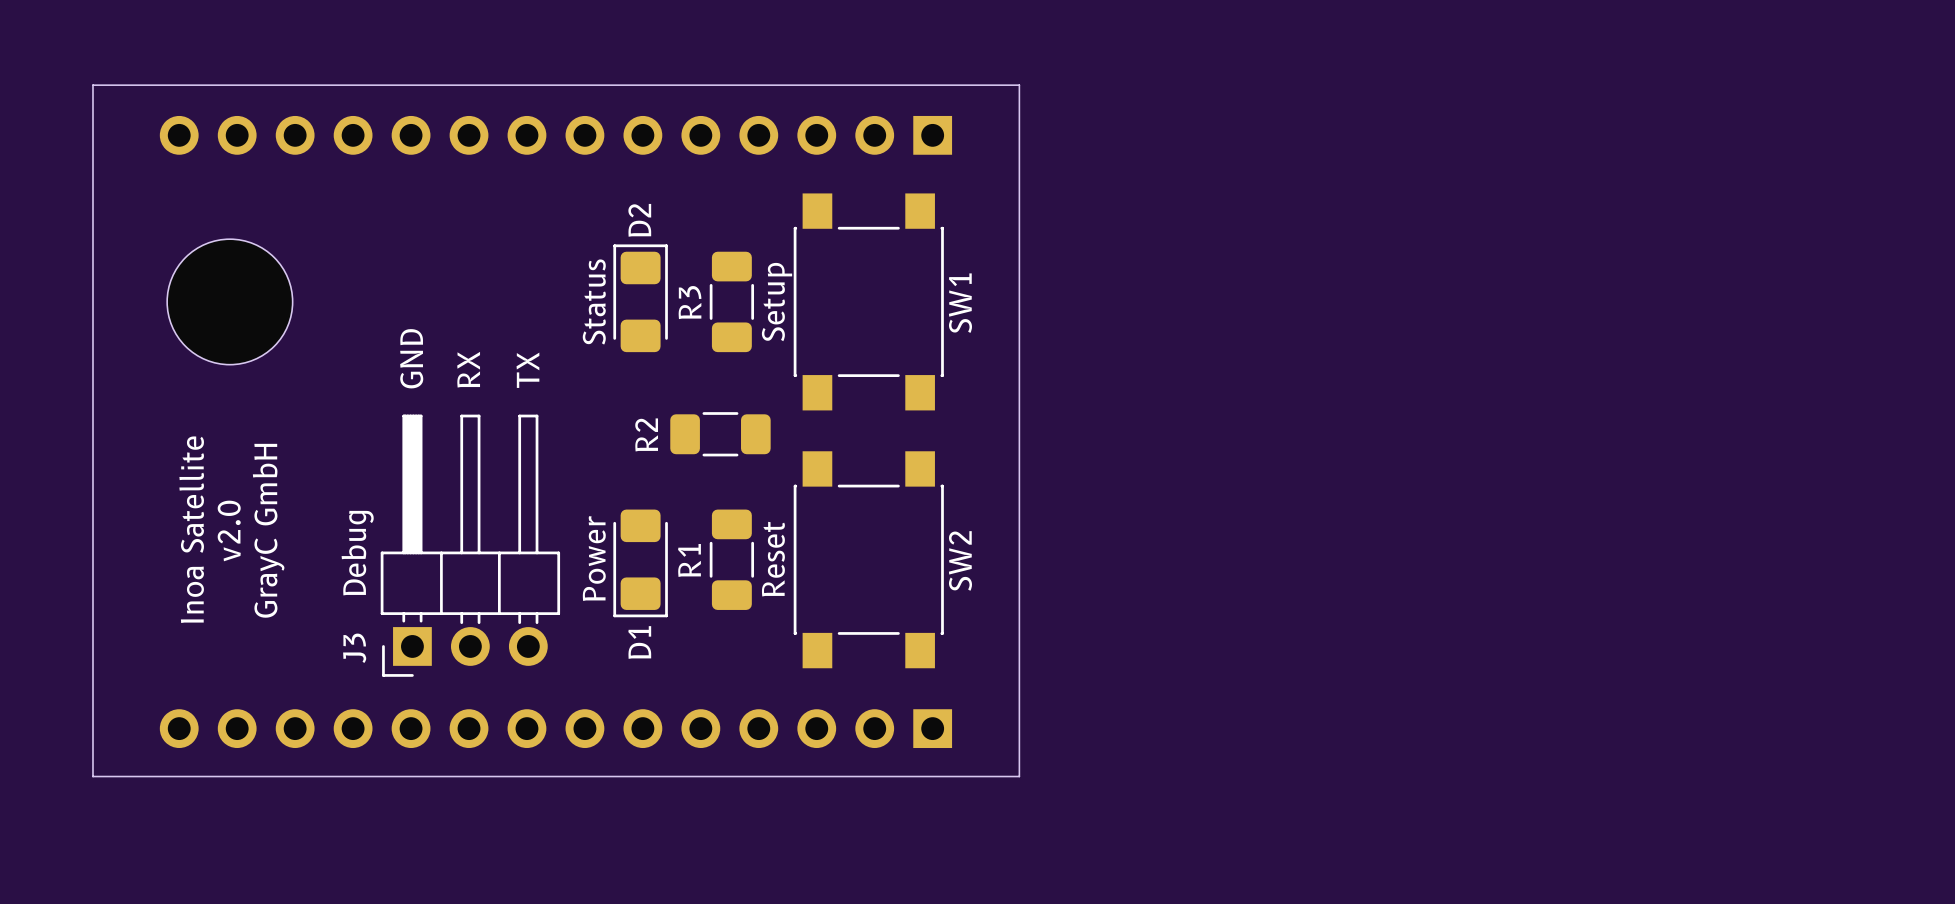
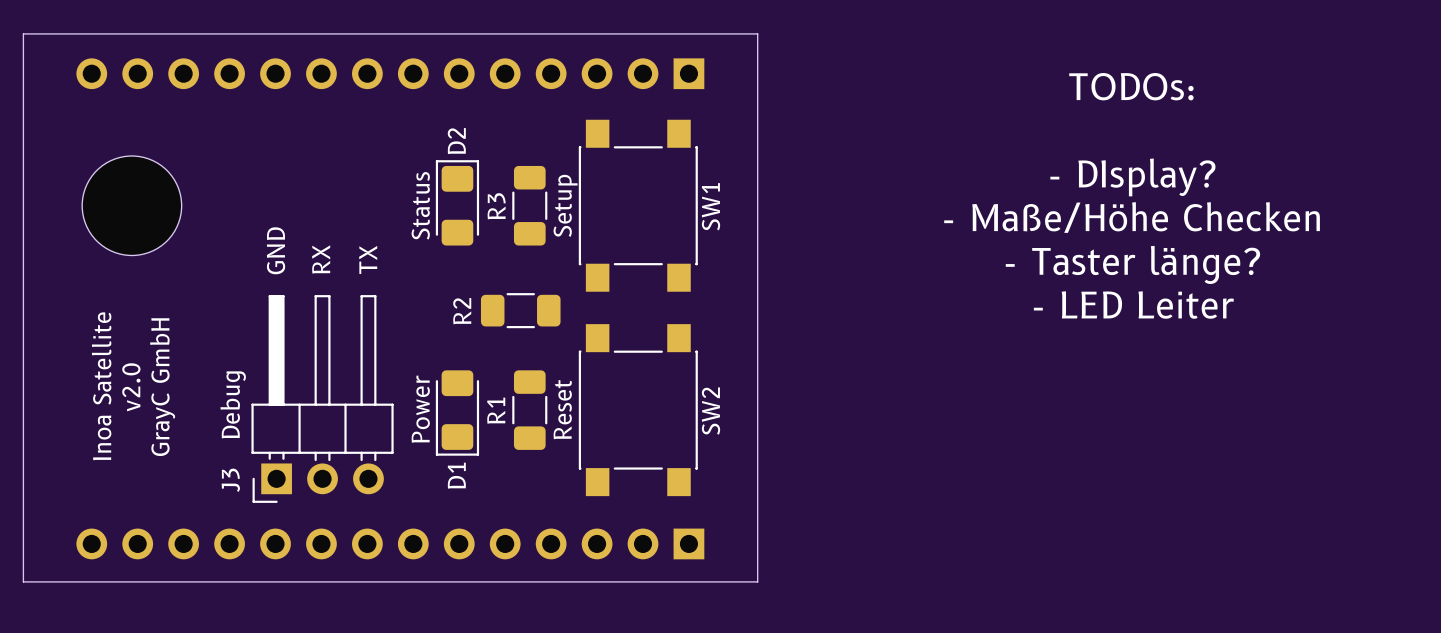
text: none -> TODOs: (1131, 86)
text: none -> - DIsplay? (1132, 177)
text: none -> - Maße/Höhe Checken (1132, 217)
text: none -> - Taster länge? (1132, 264)
text: none -> - LED Leiter (1133, 305)

